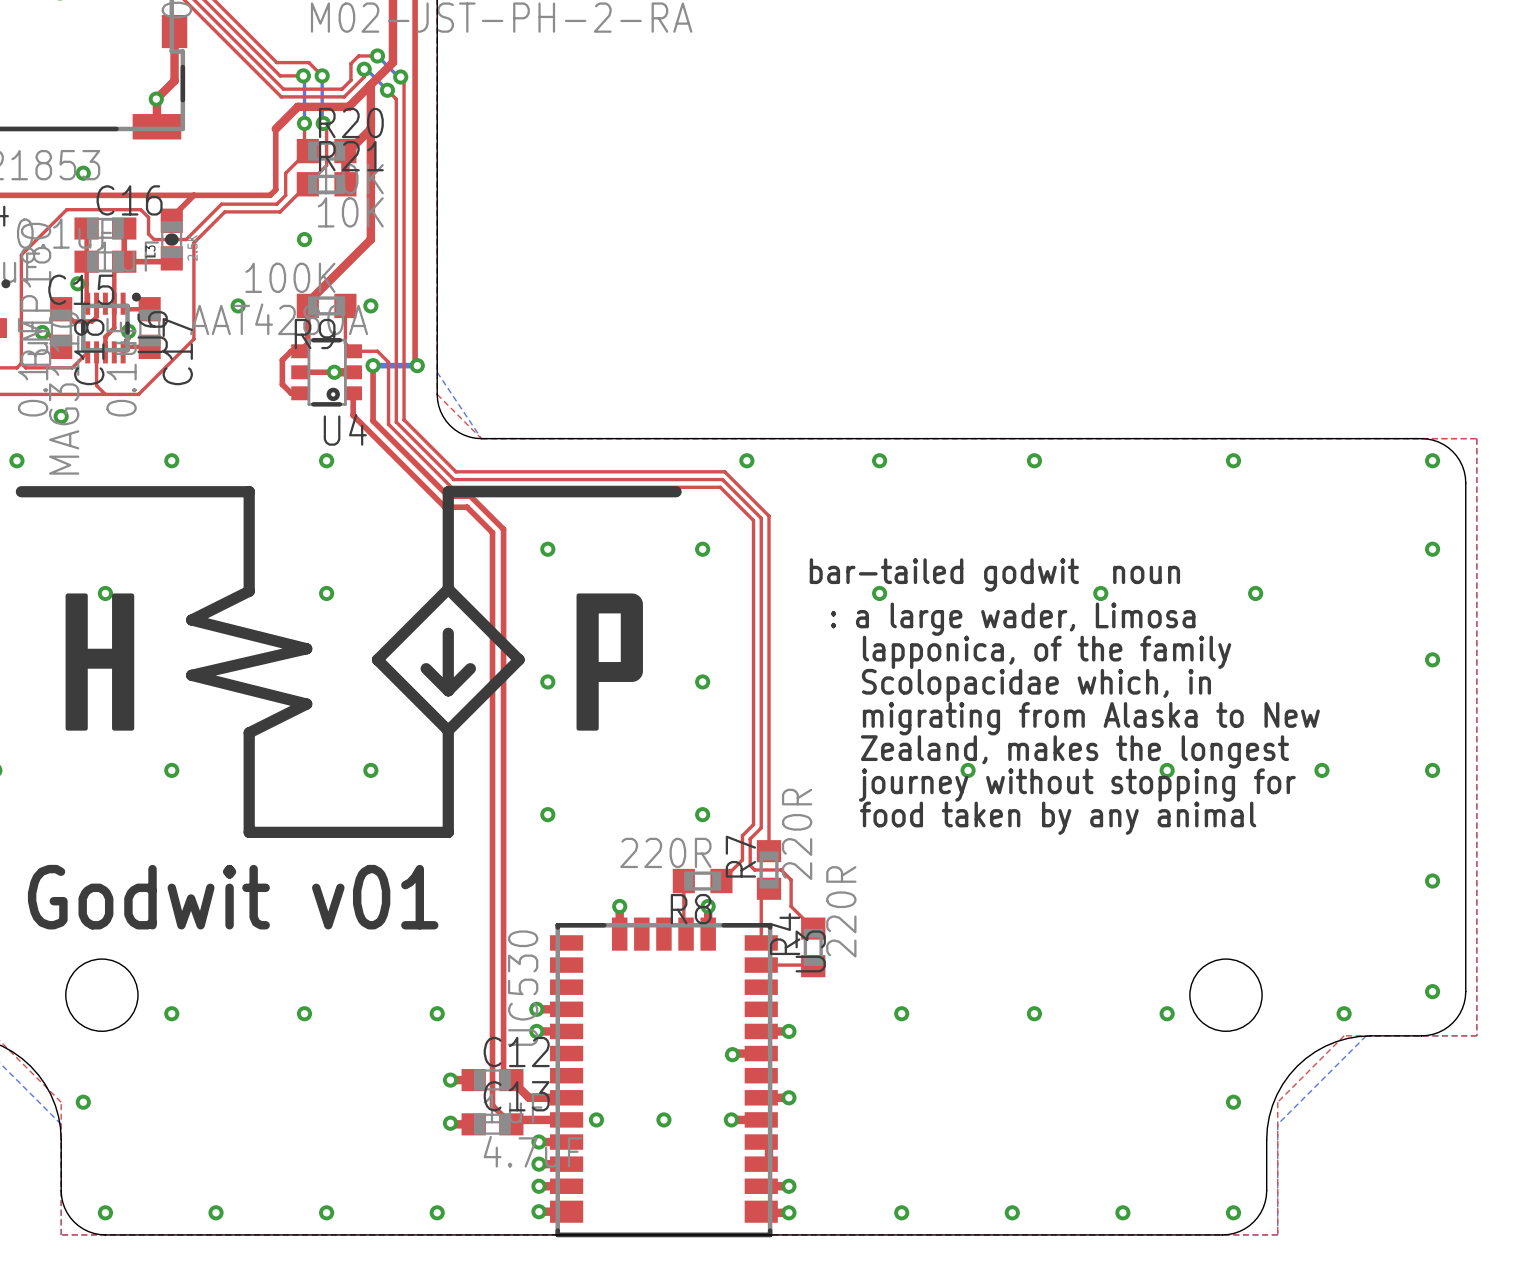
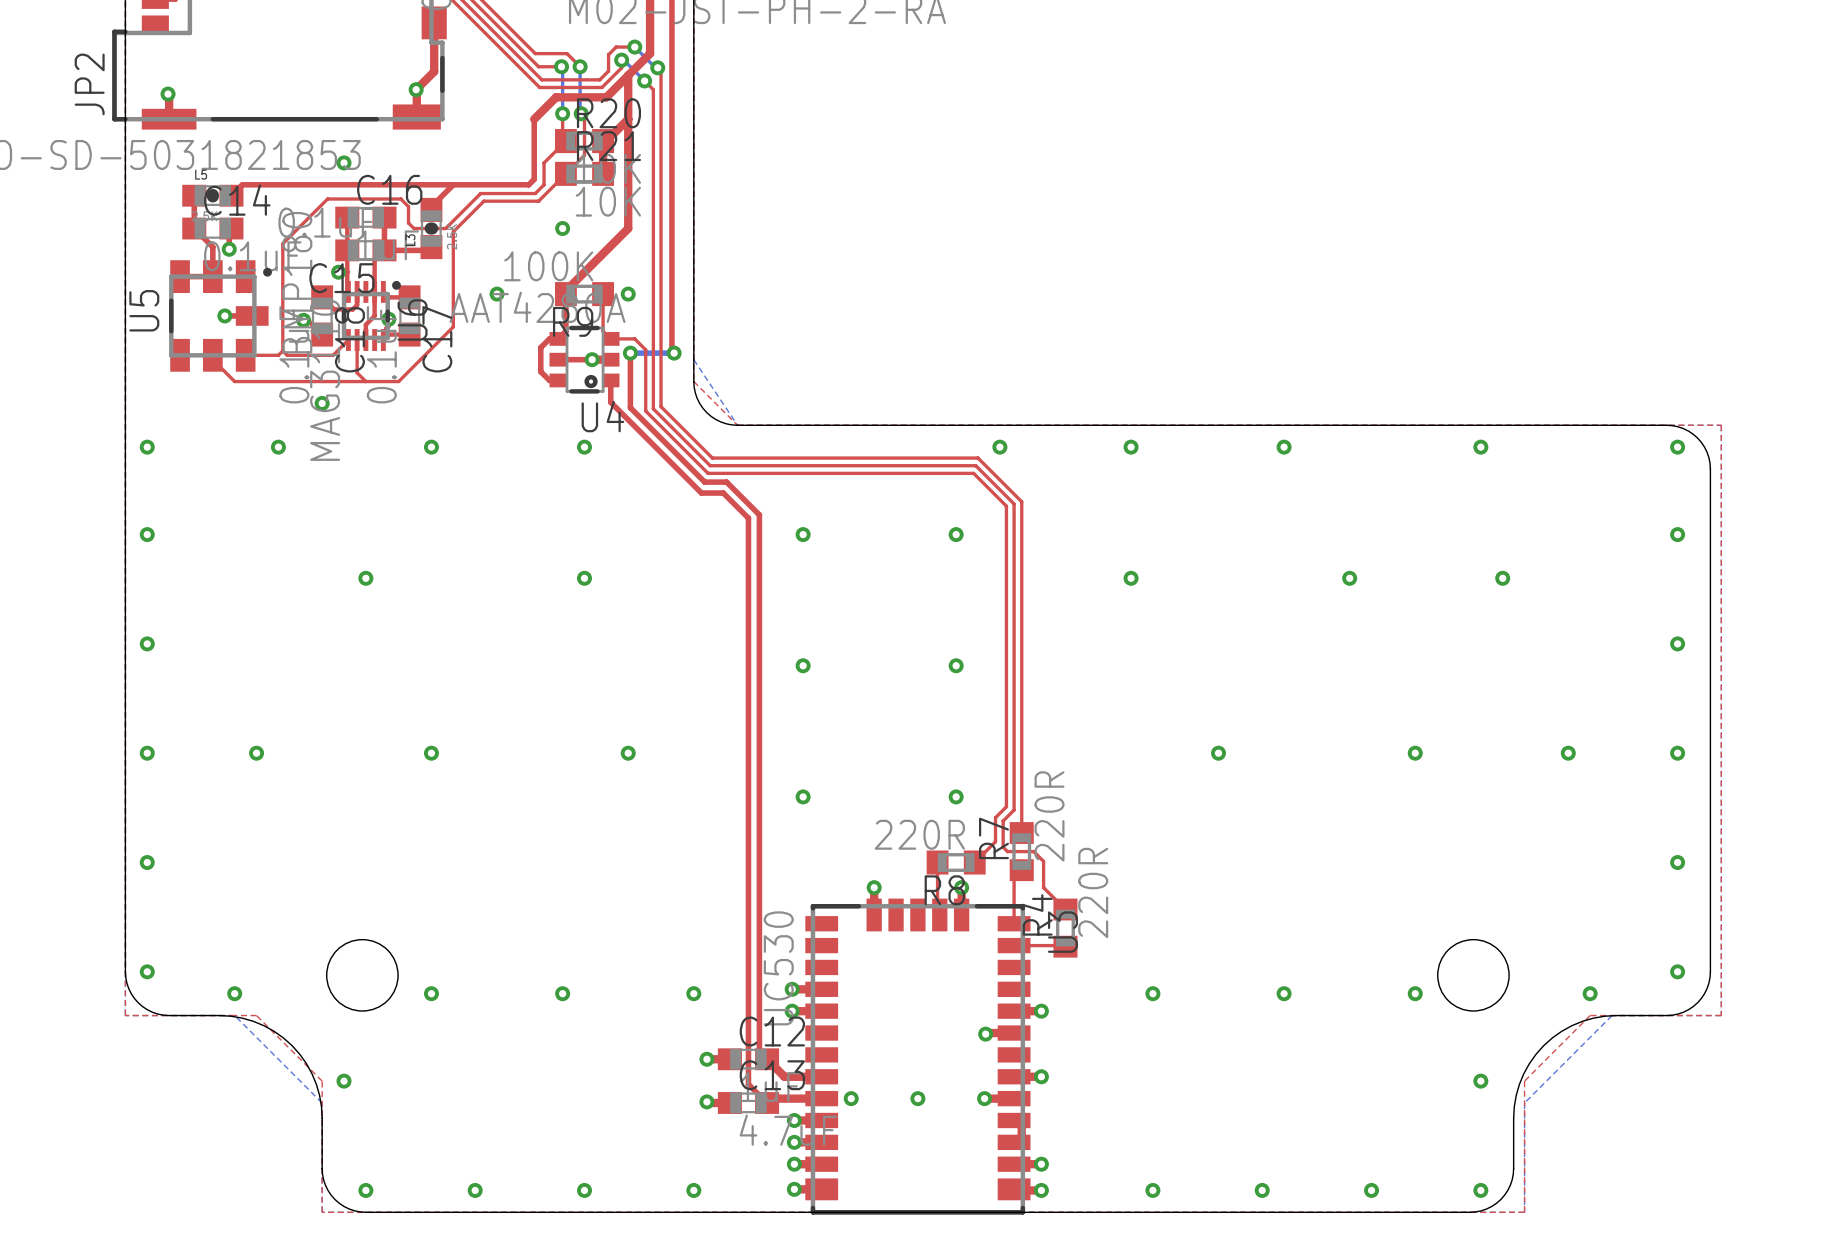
drawing: [15, 486, 682, 838] -> none
text: bar-tailed godwit noun (994, 574) -> none
text: : a large wader, Limosa (1013, 619) -> none
text: lapponica, of the family (1047, 652) -> none
text: Scolopacidae which, in (1036, 685) -> none
text: migrating from Alaska to New (1091, 718) -> none
text: Zealand, makes the longest (1074, 751) -> none
text: journey without stopping for (1077, 785) -> none
text: food taken by any animal (1058, 818) -> none
text: Godwit v01 (233, 897) -> none

